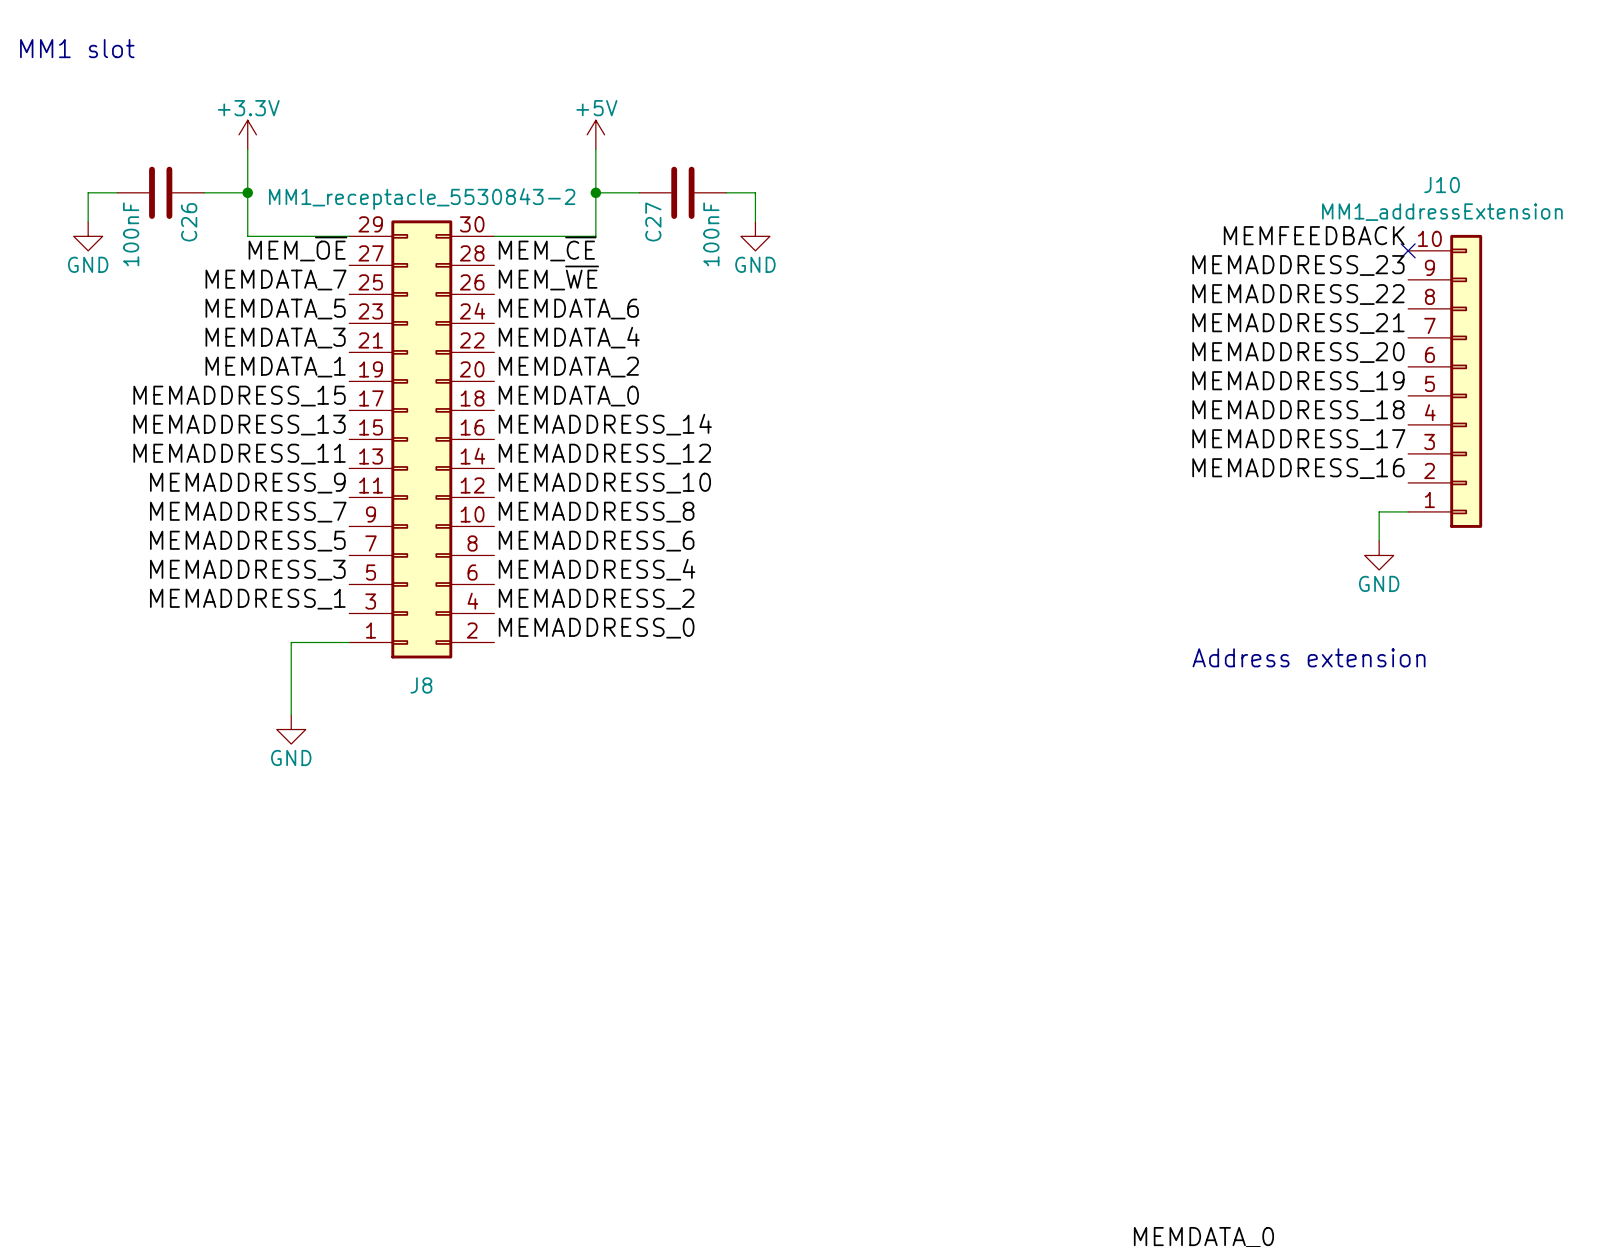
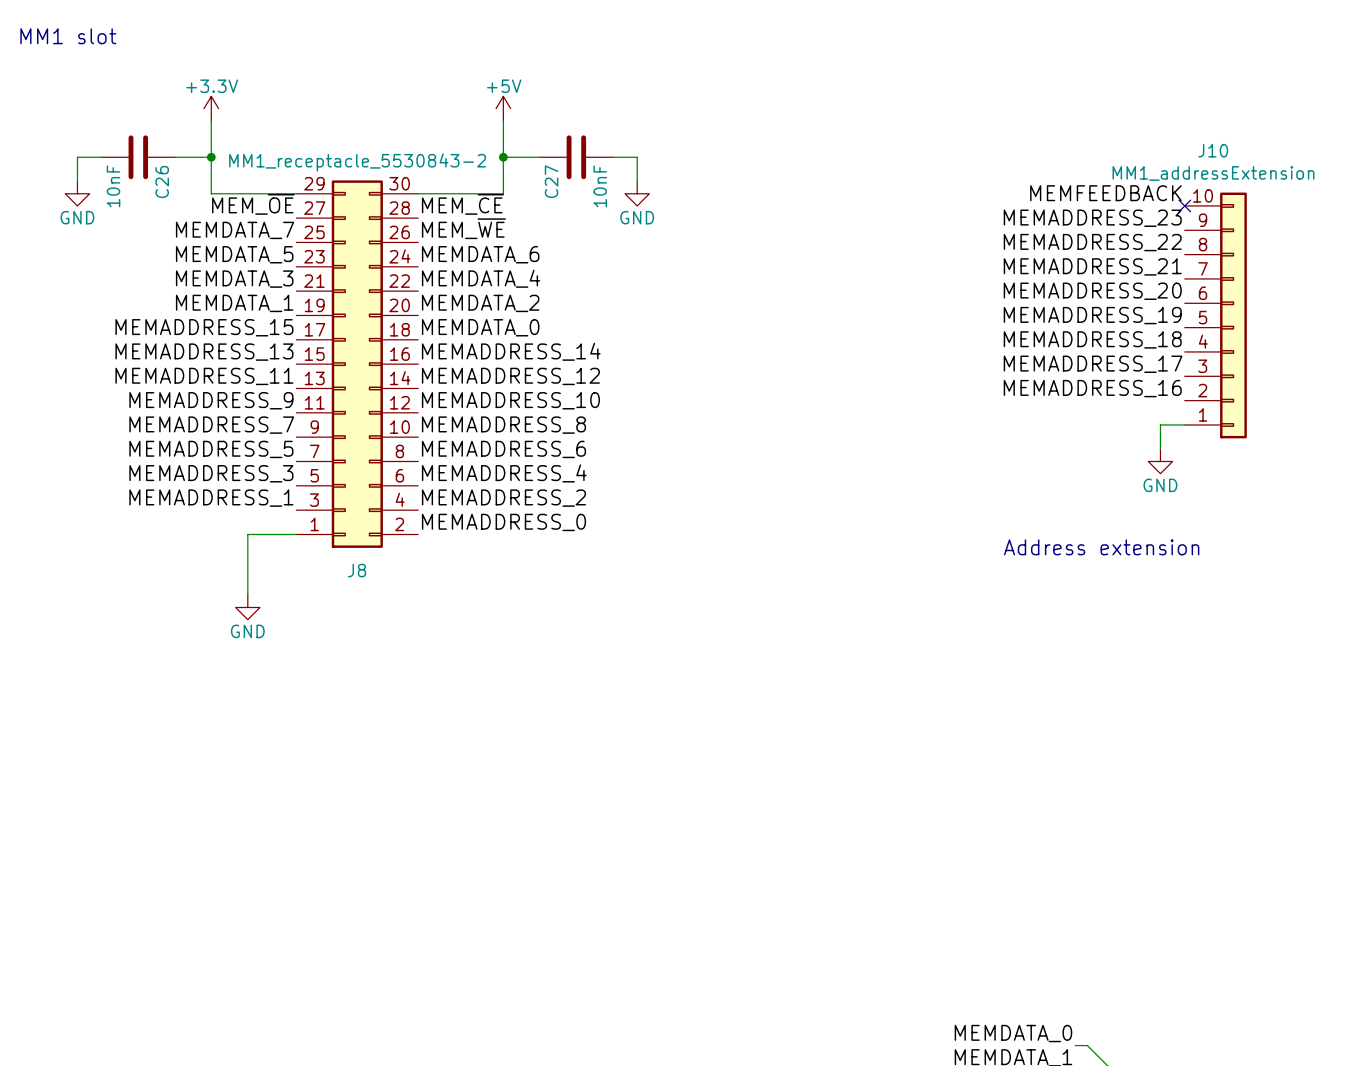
C26 value: 100nF (131, 234) -> 10nF (113, 186)
C27 value: 100nF (711, 234) -> 10nF (600, 186)

